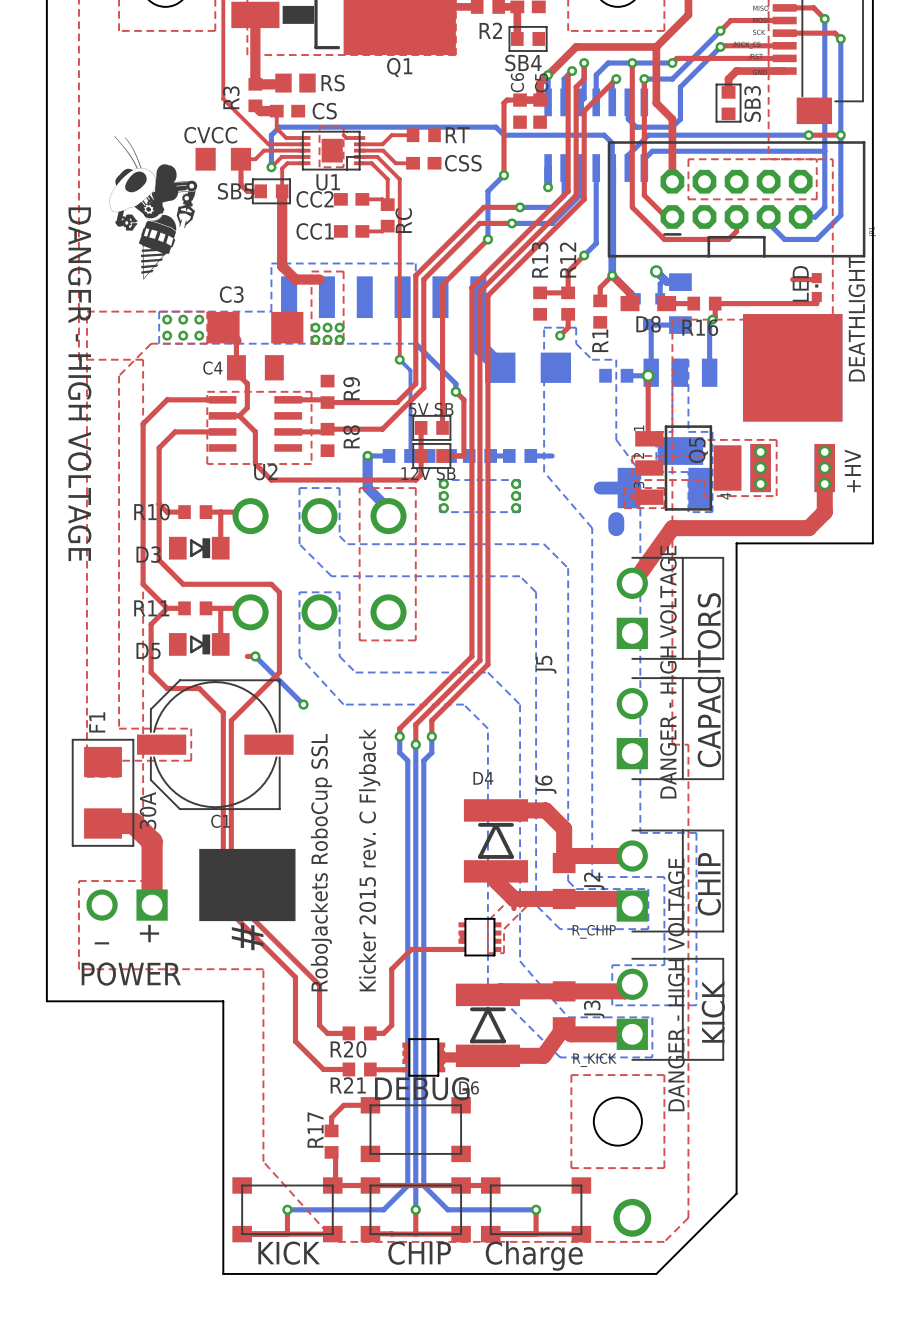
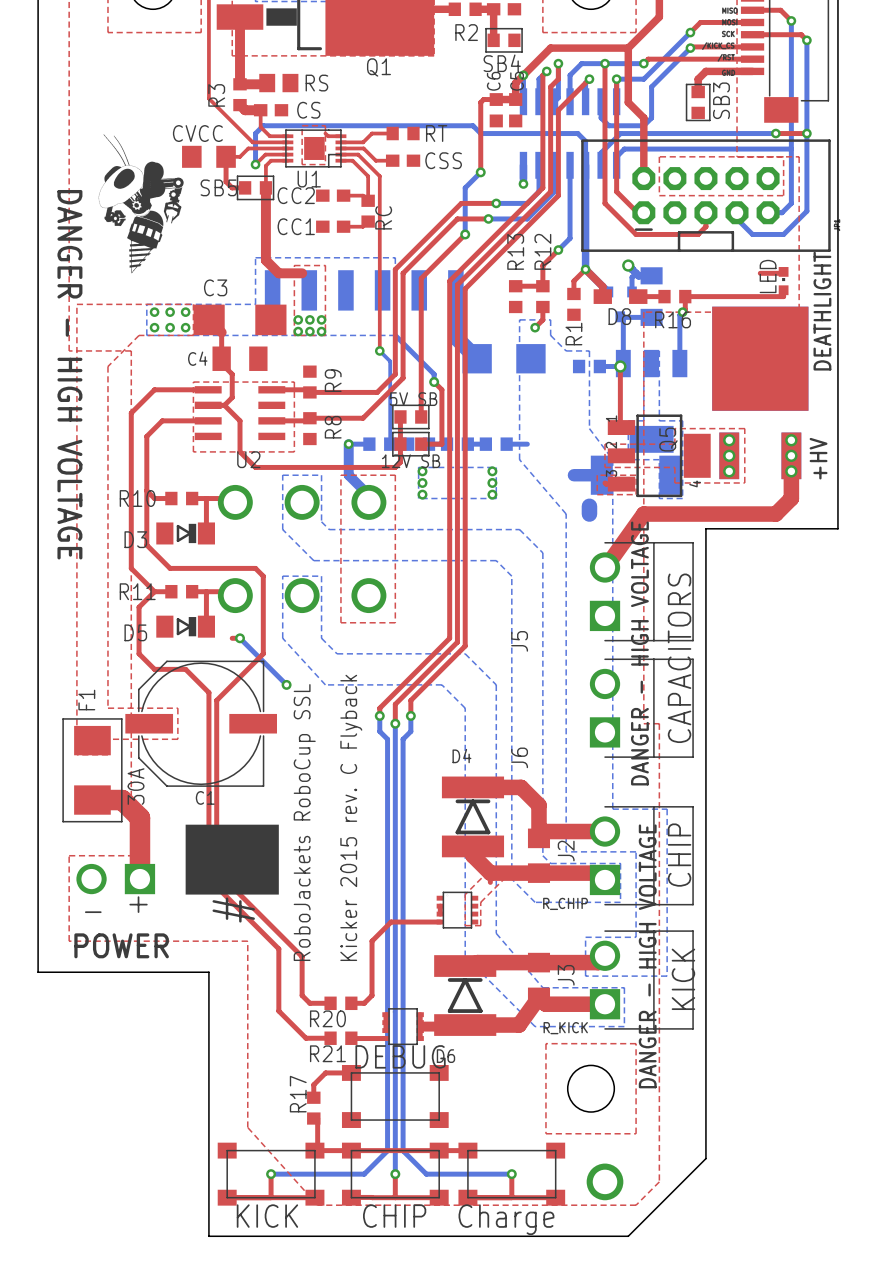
part footprint: [458, 918, 502, 956] -> [436, 892, 479, 928]
part footprint: [402, 1039, 446, 1076] -> [382, 1008, 424, 1045]

